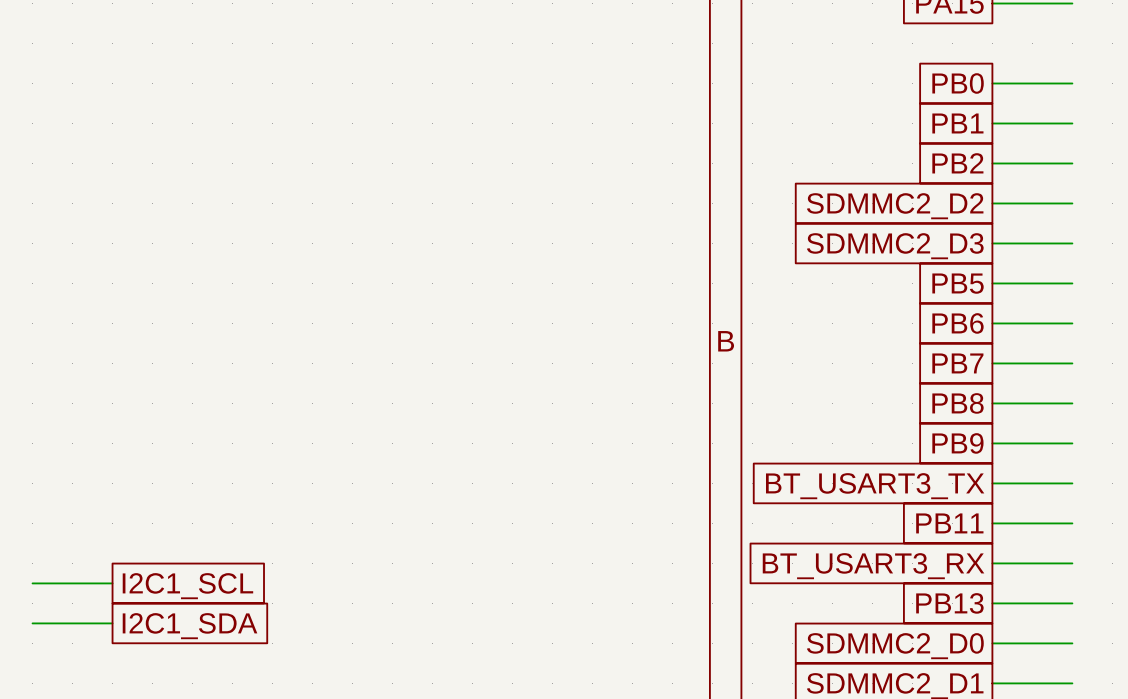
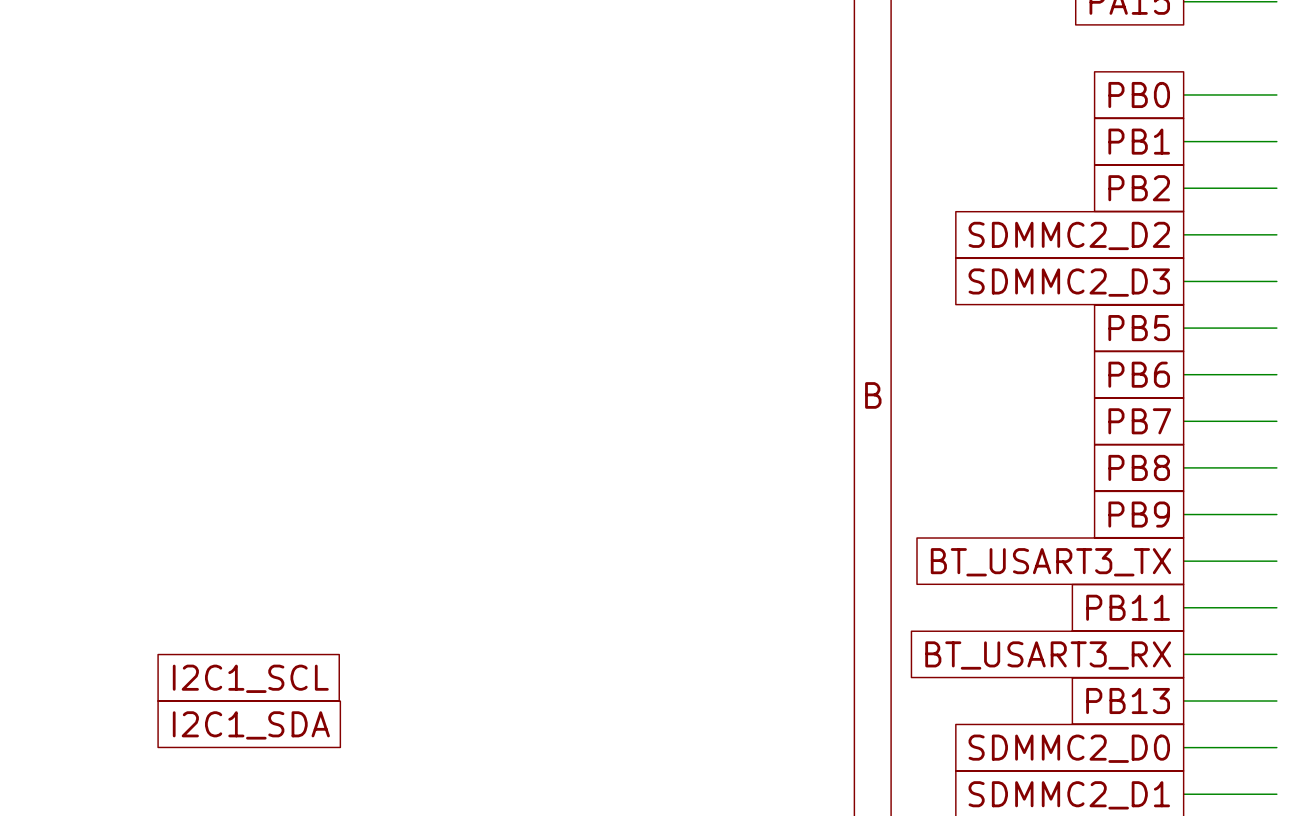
wire: (32, 583) (112, 583) -> none
wire: (32, 623) (112, 623) -> none

